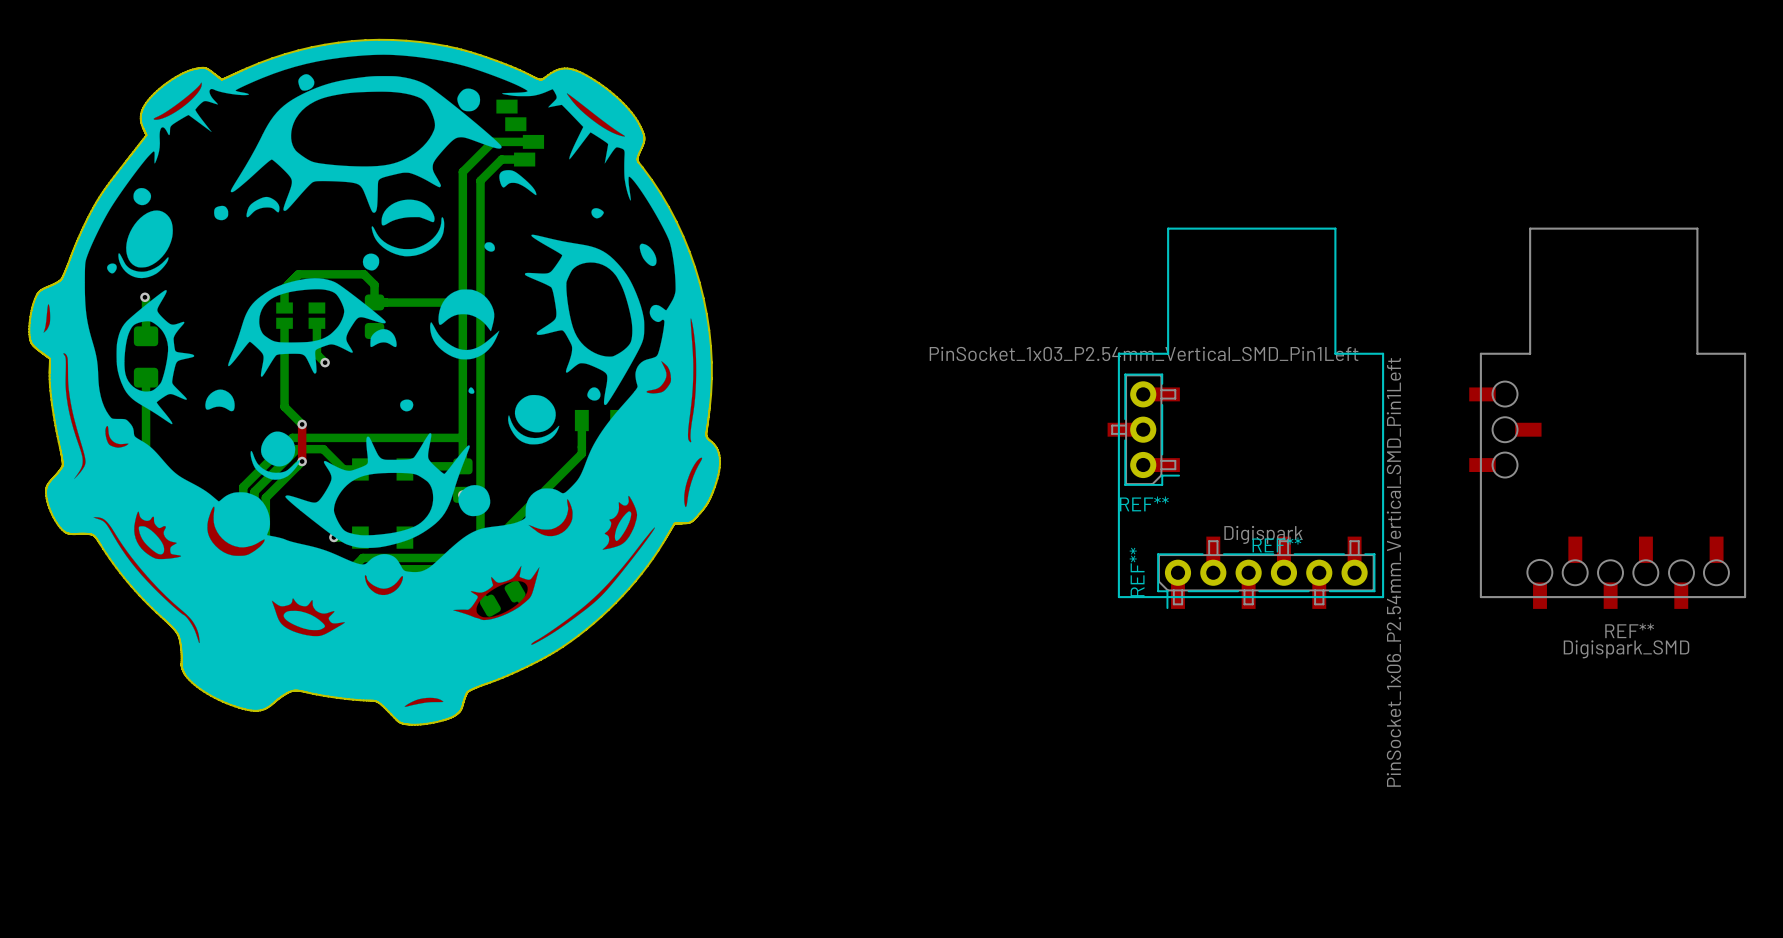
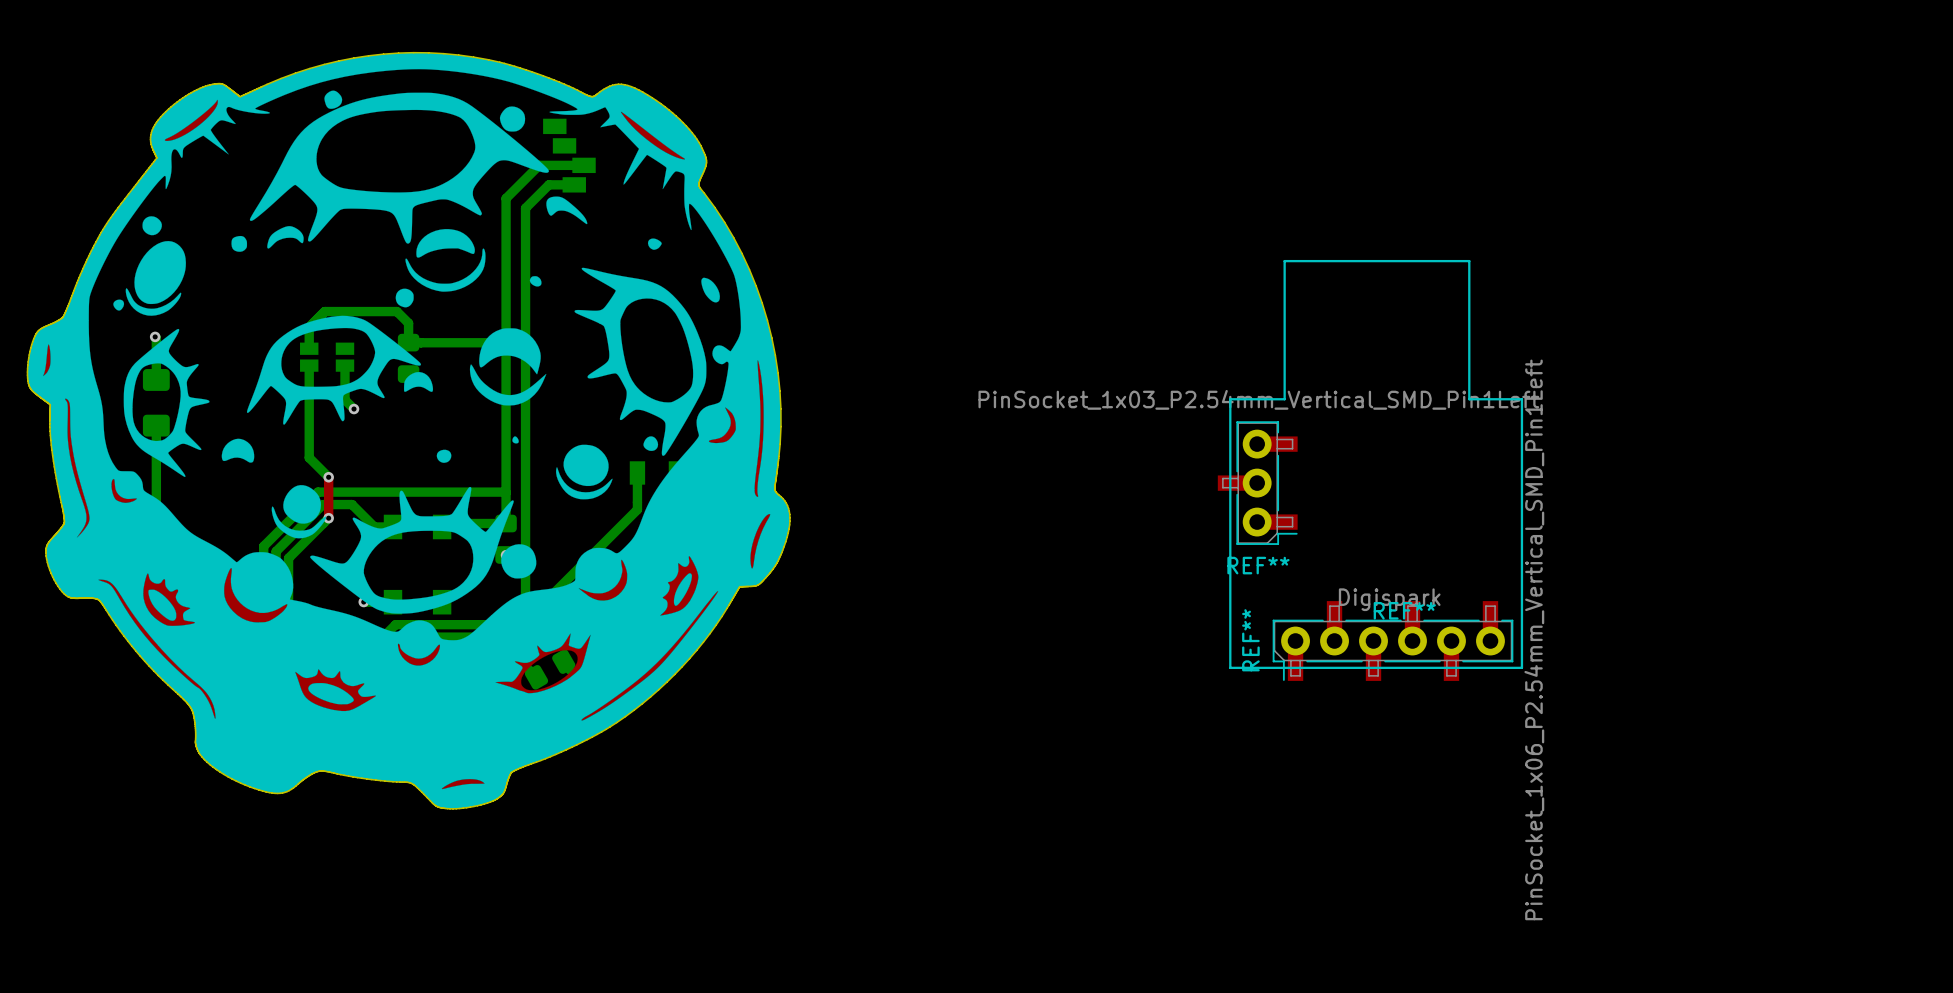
REF**: Digispark_SMD (1607, 418) -> none

